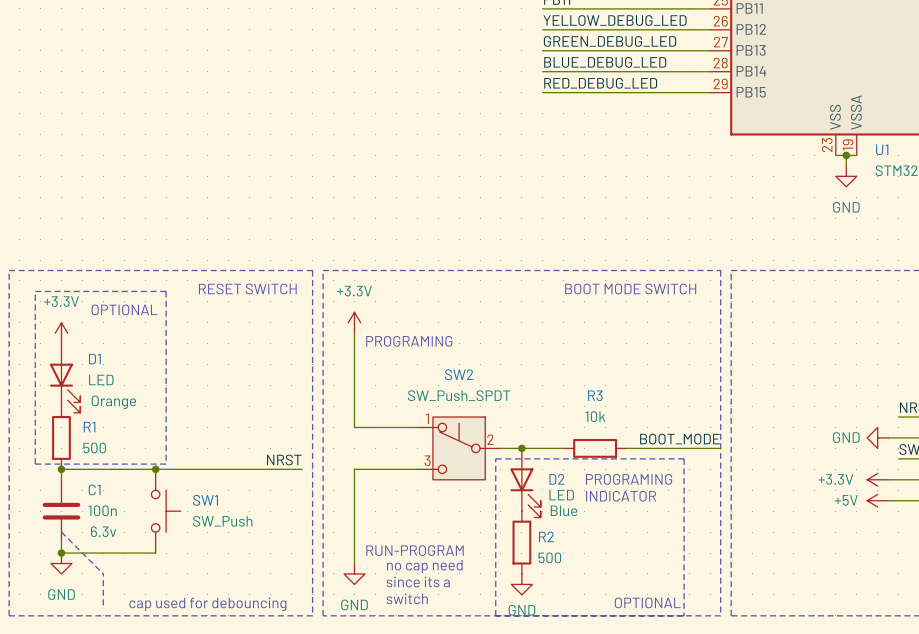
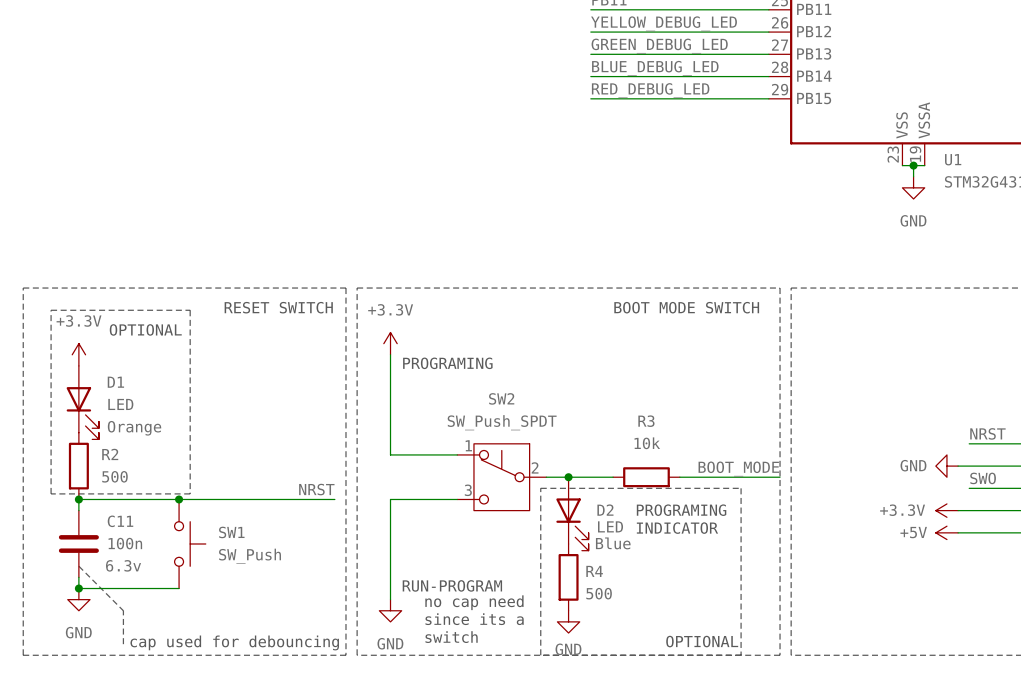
R1 name: R1 (89, 427) -> R2 (110, 454)
C1 name: C1 (94, 489) -> C11 (120, 521)
R2 name: R2 (546, 536) -> R4 (594, 571)

